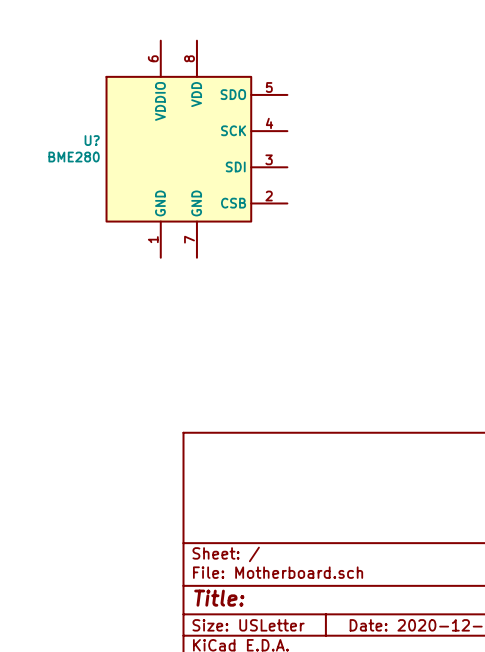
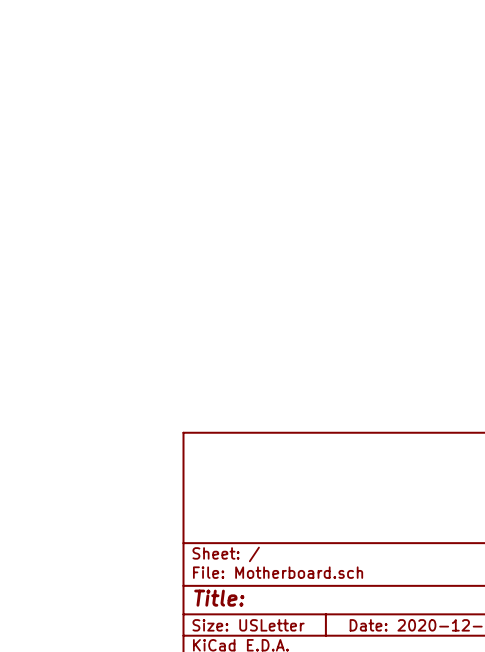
U?: BME280 (196, 149) -> none

